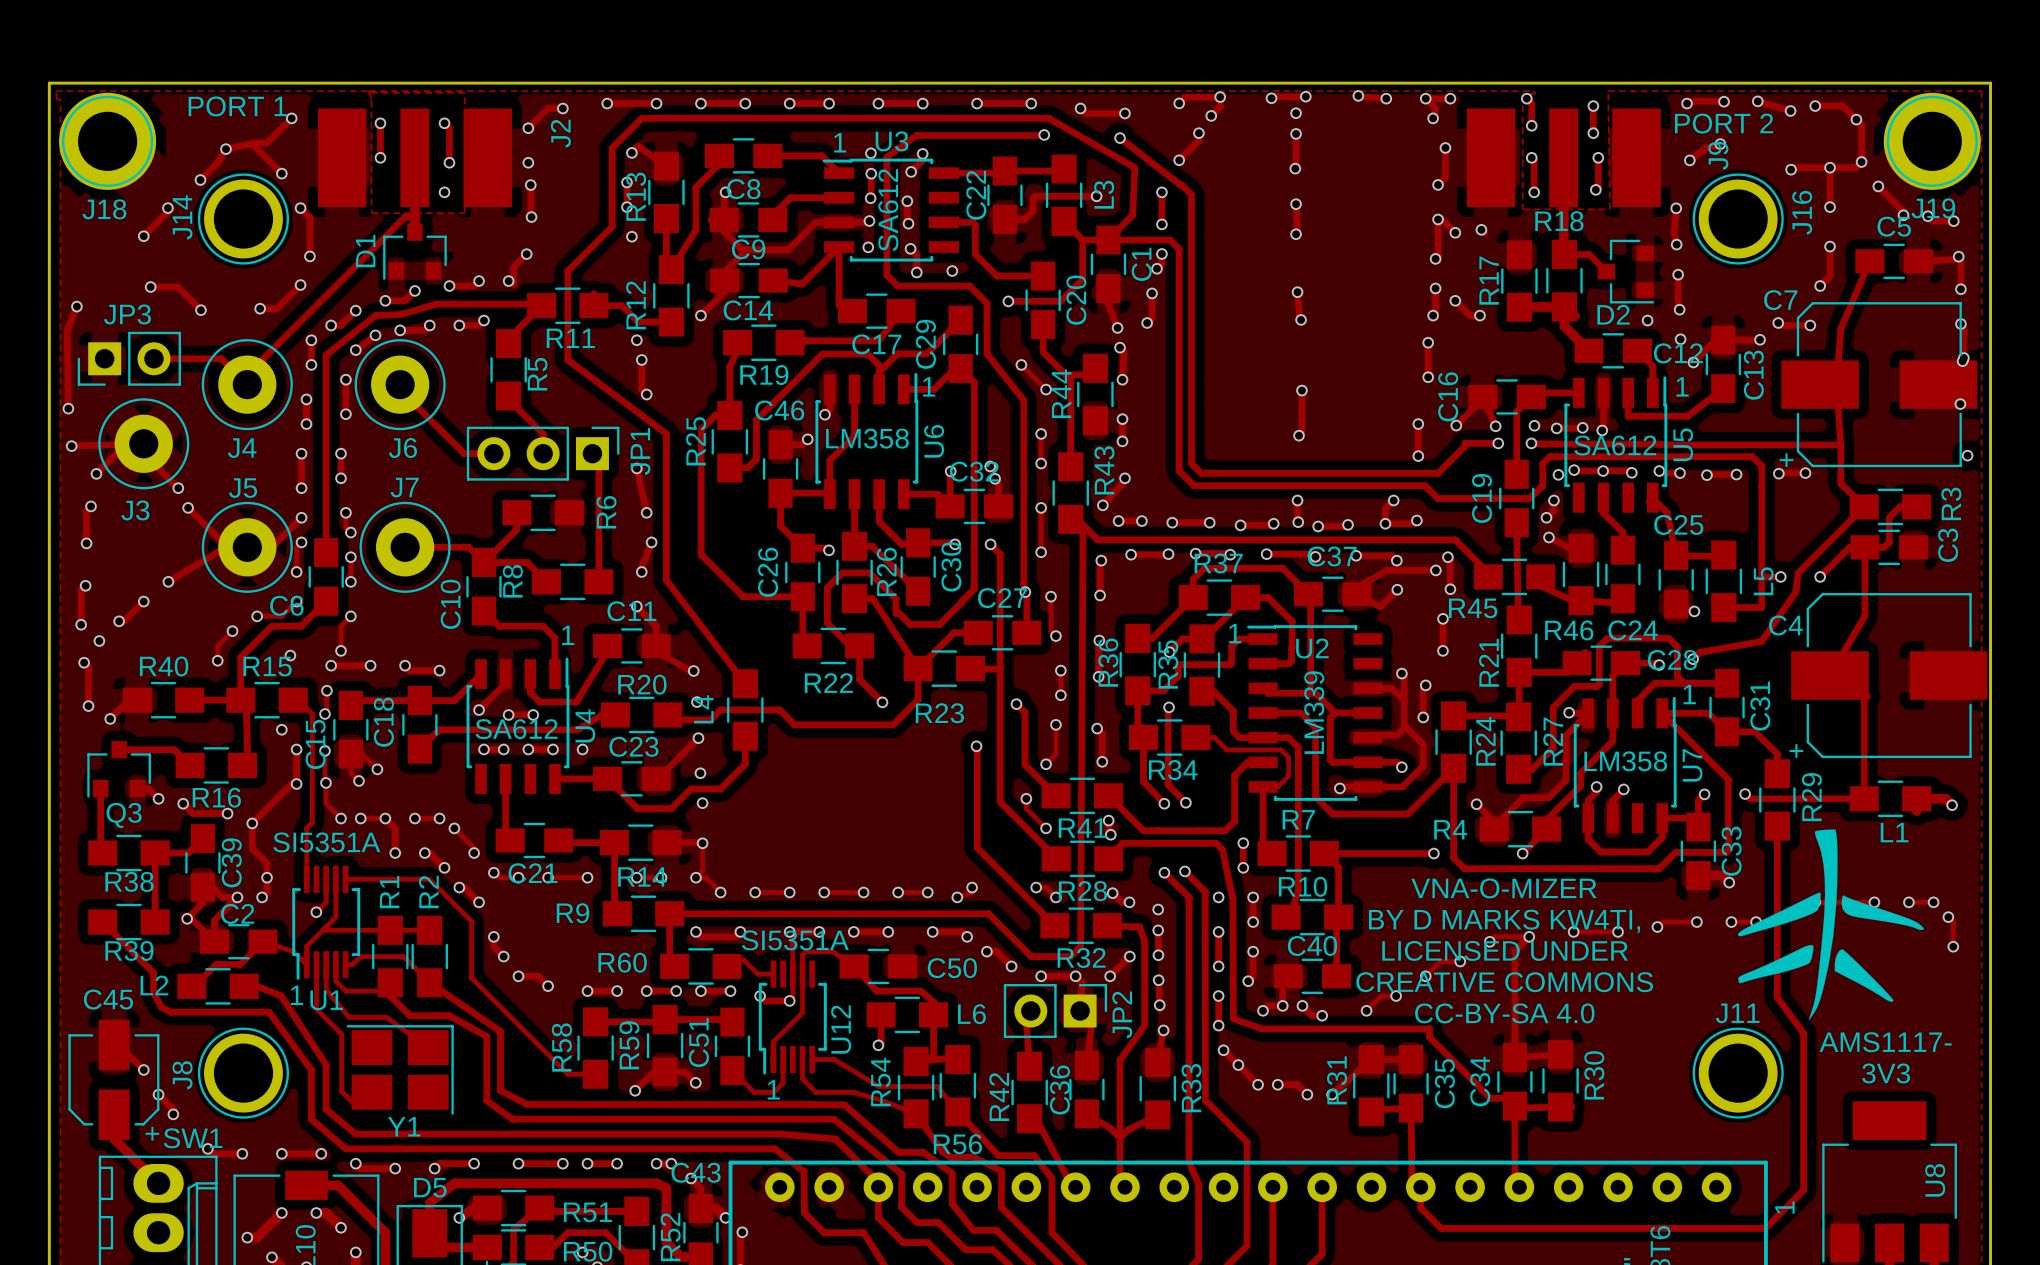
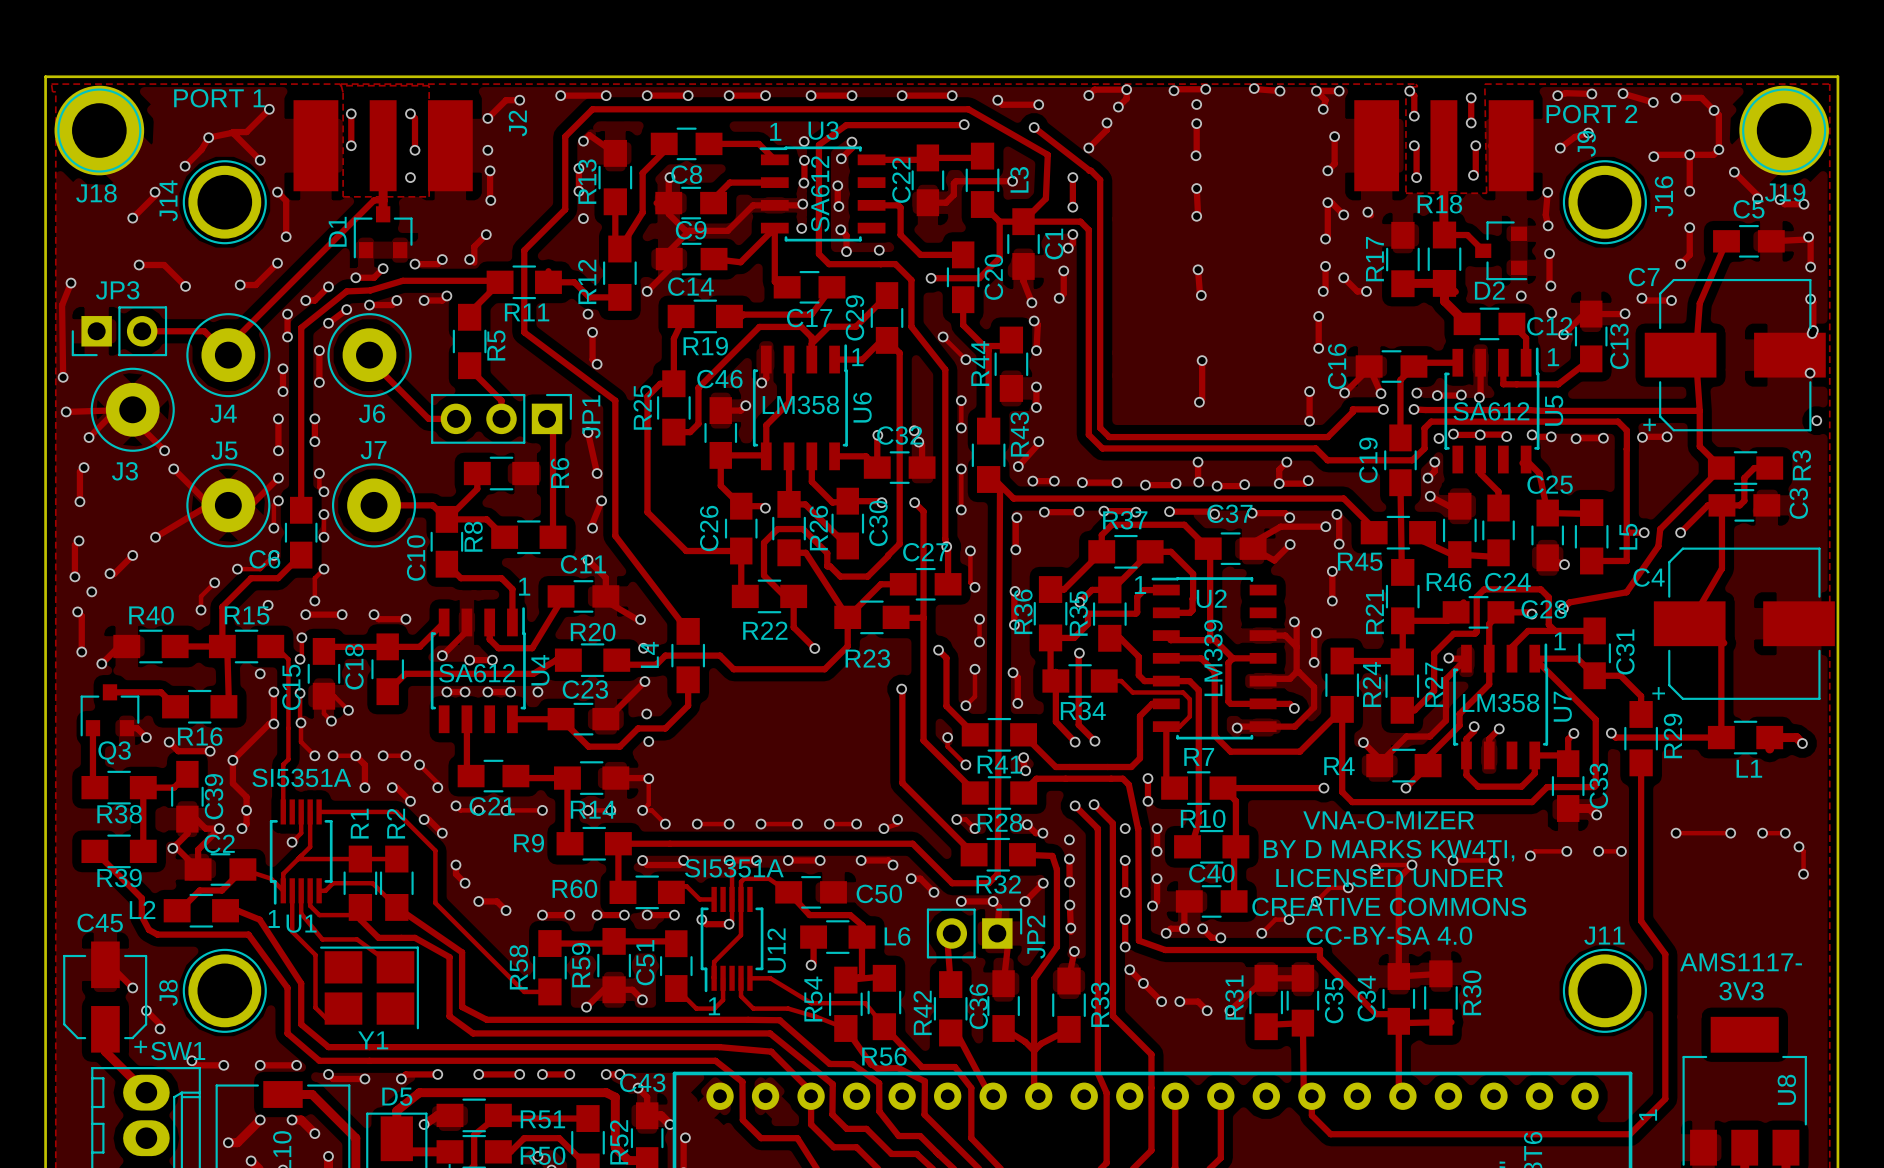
drawing: [1737, 829, 1925, 1021] -> none

